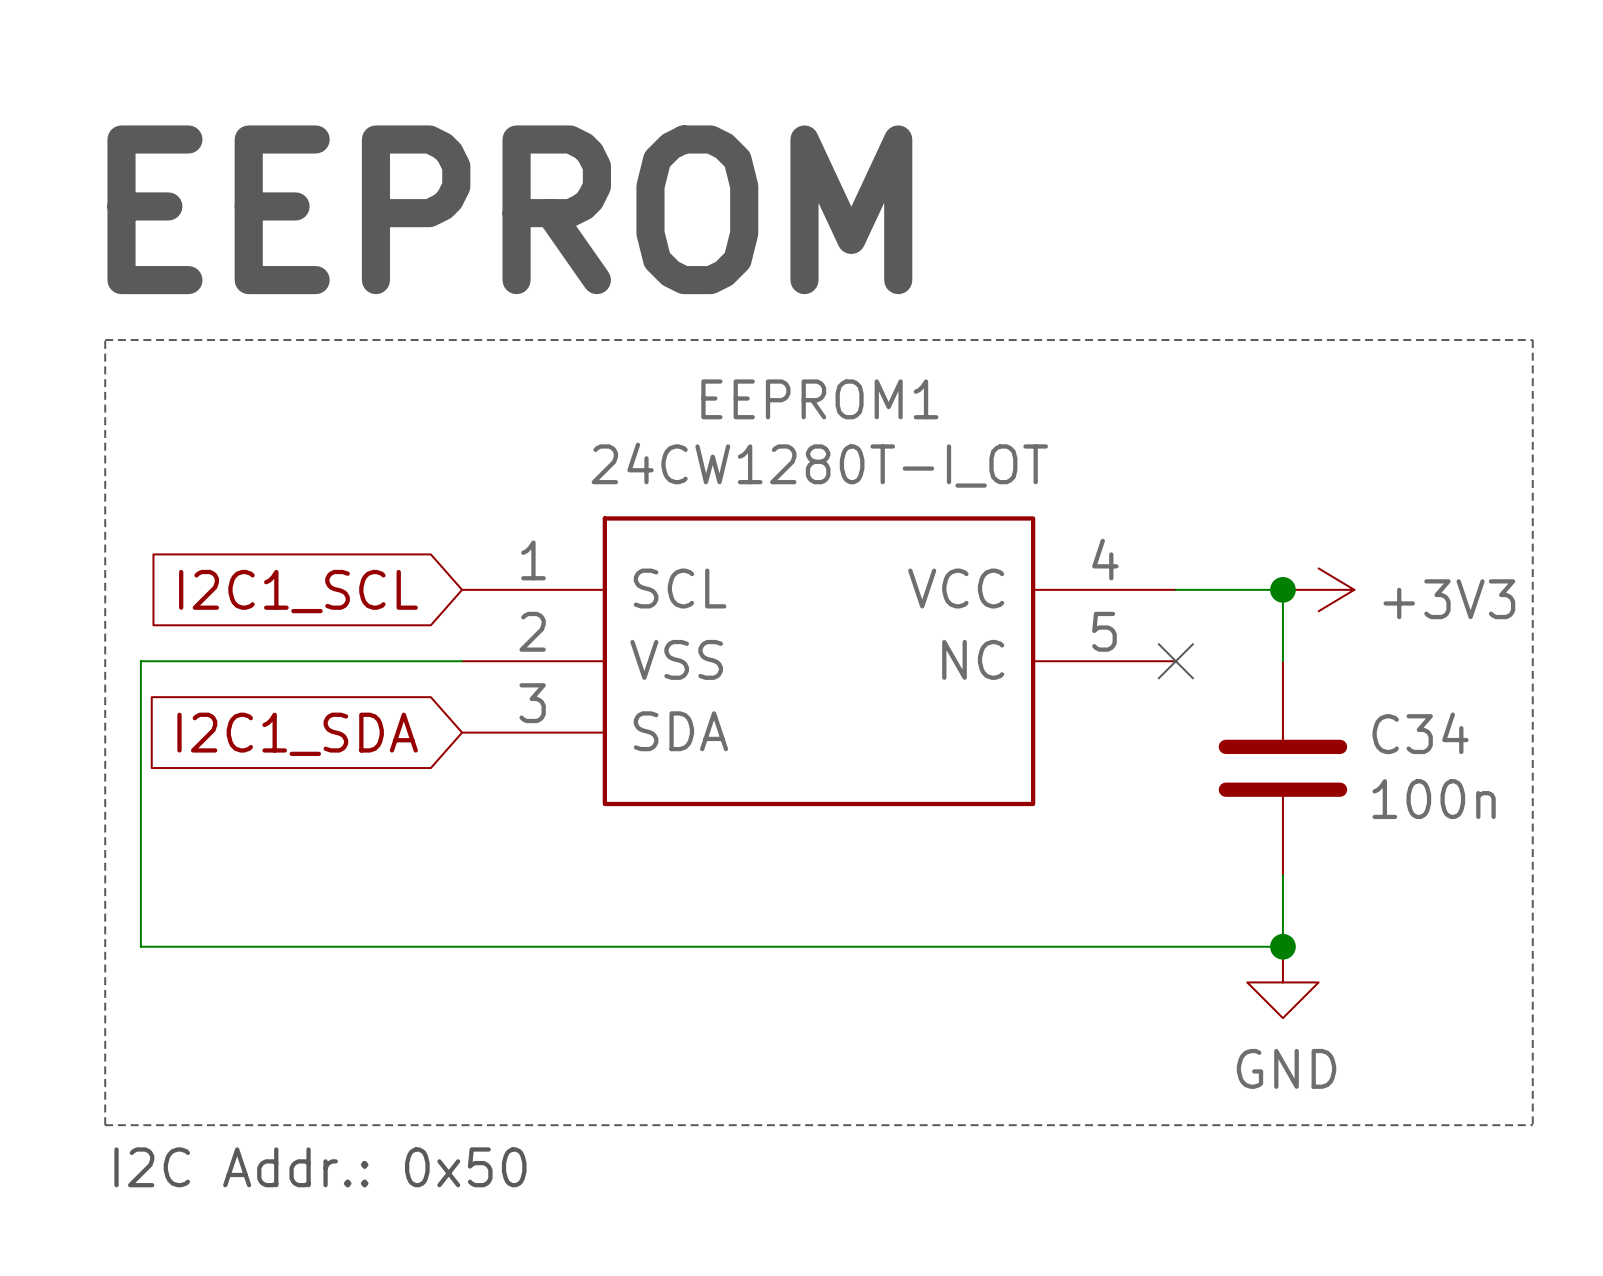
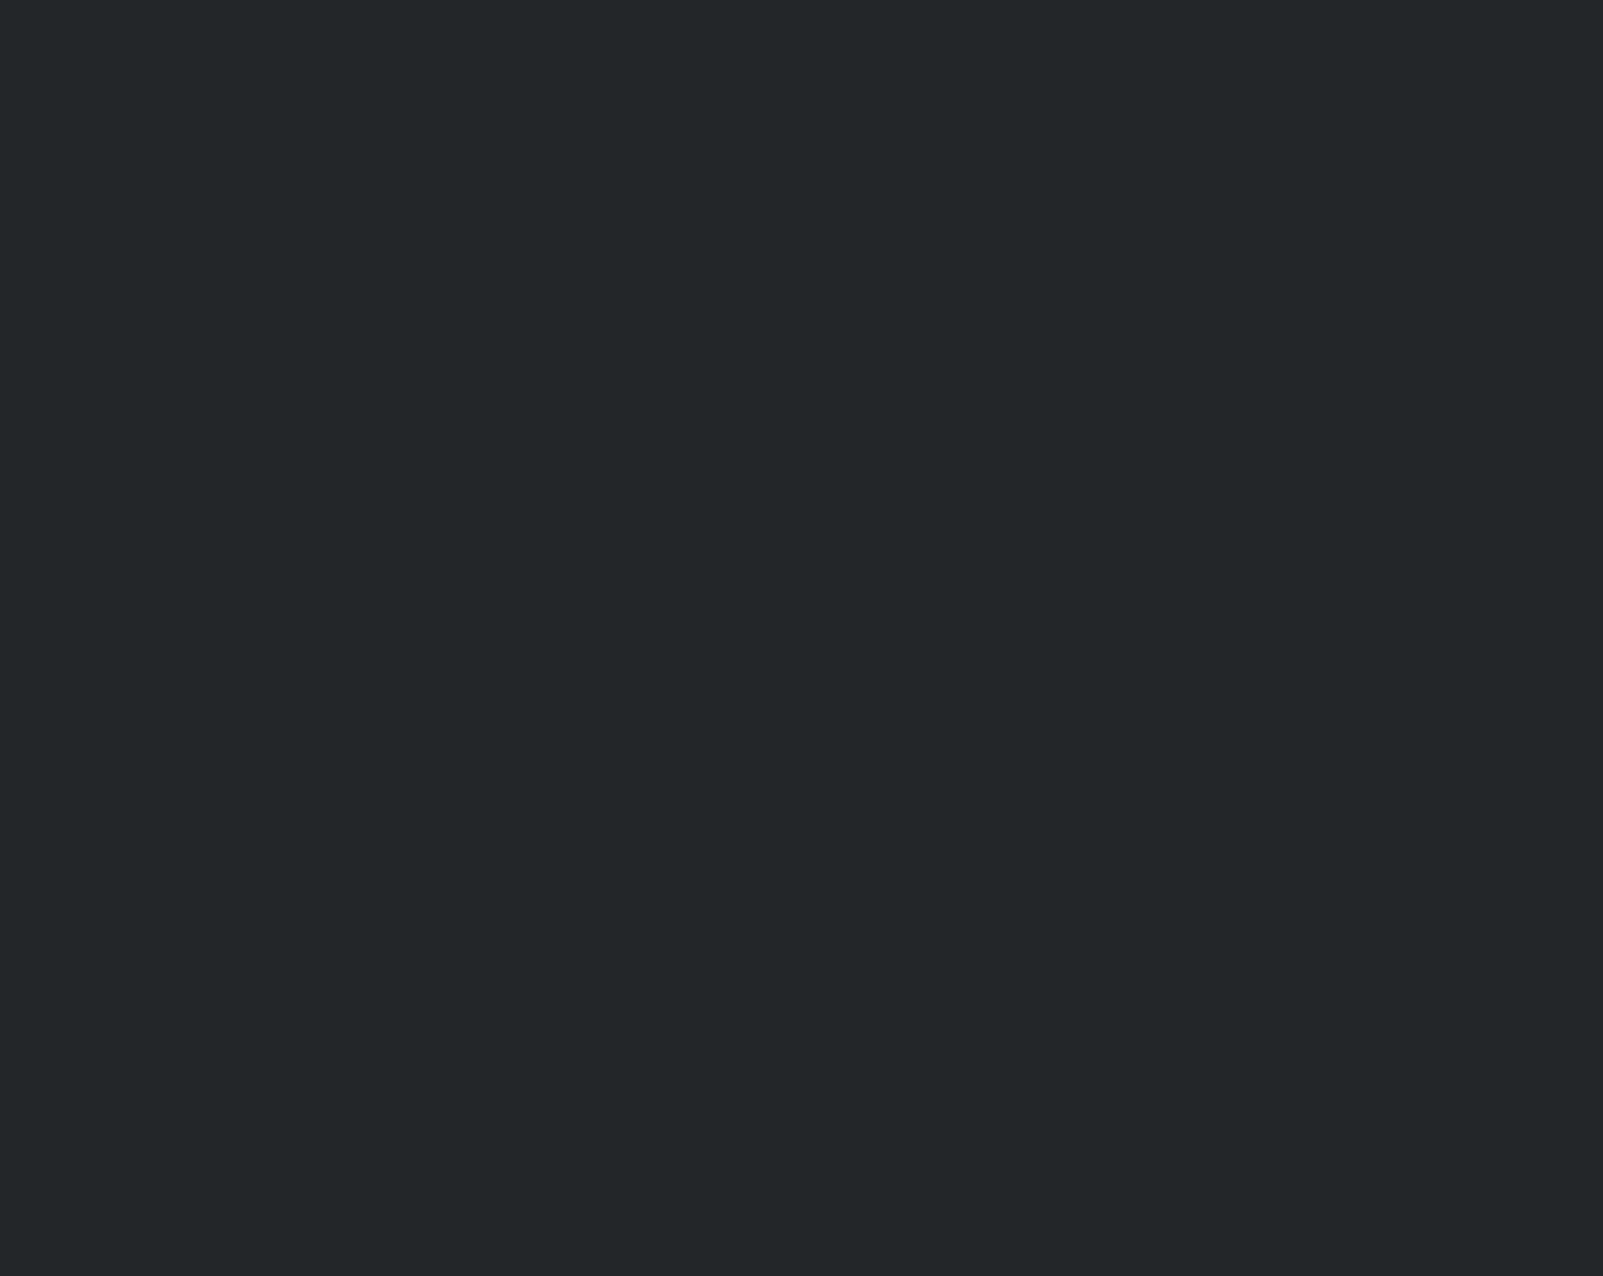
text: EEPROM (509, 209) -> none
line: (105, 340) (105, 1125) (1532, 1125) (1532, 340) (105, 340) -> none
wire: (1175, 589) (1282, 589) (1282, 661) -> none
junction: (1282, 589) -> none
power symbol: +3V3 (1318, 589) -> none
global label: I2C1_SCL (298, 591) -> none
wire: (462, 661) (140, 661) (140, 946) (1282, 946) (1282, 875) -> none
EEPROM1: 24CW1280T-I_OT (818, 661) -> none
no-connect mark: (1175, 661) -> none
global label: I2C1_SDA (297, 734) -> none
C34: 100n (1282, 768) -> none
junction: (1282, 946) -> none
power symbol: GND (1282, 982) -> none
text: I2C Addr.: 0x50 (320, 1167) -> none

